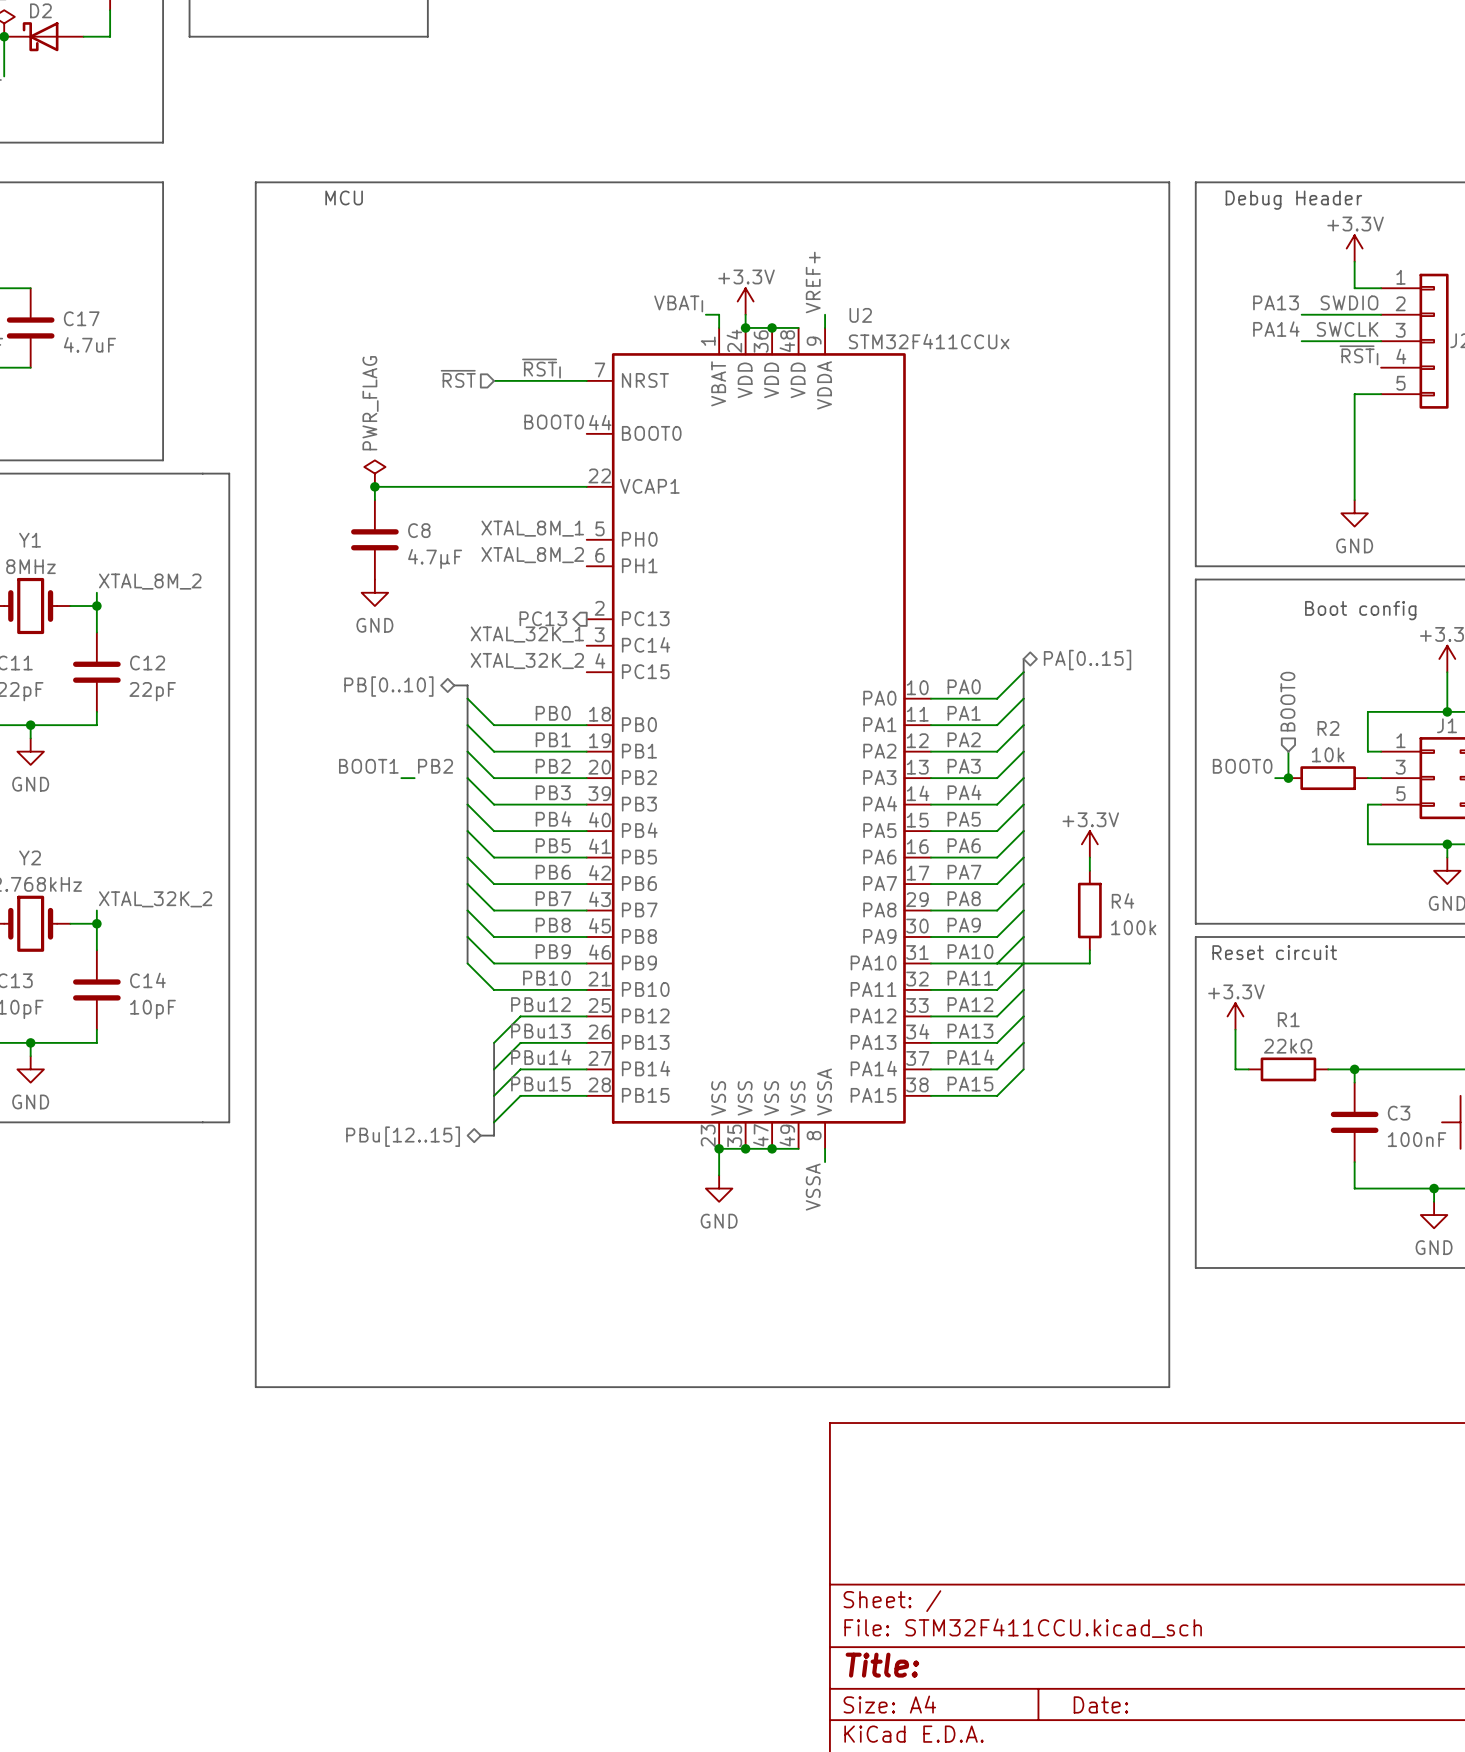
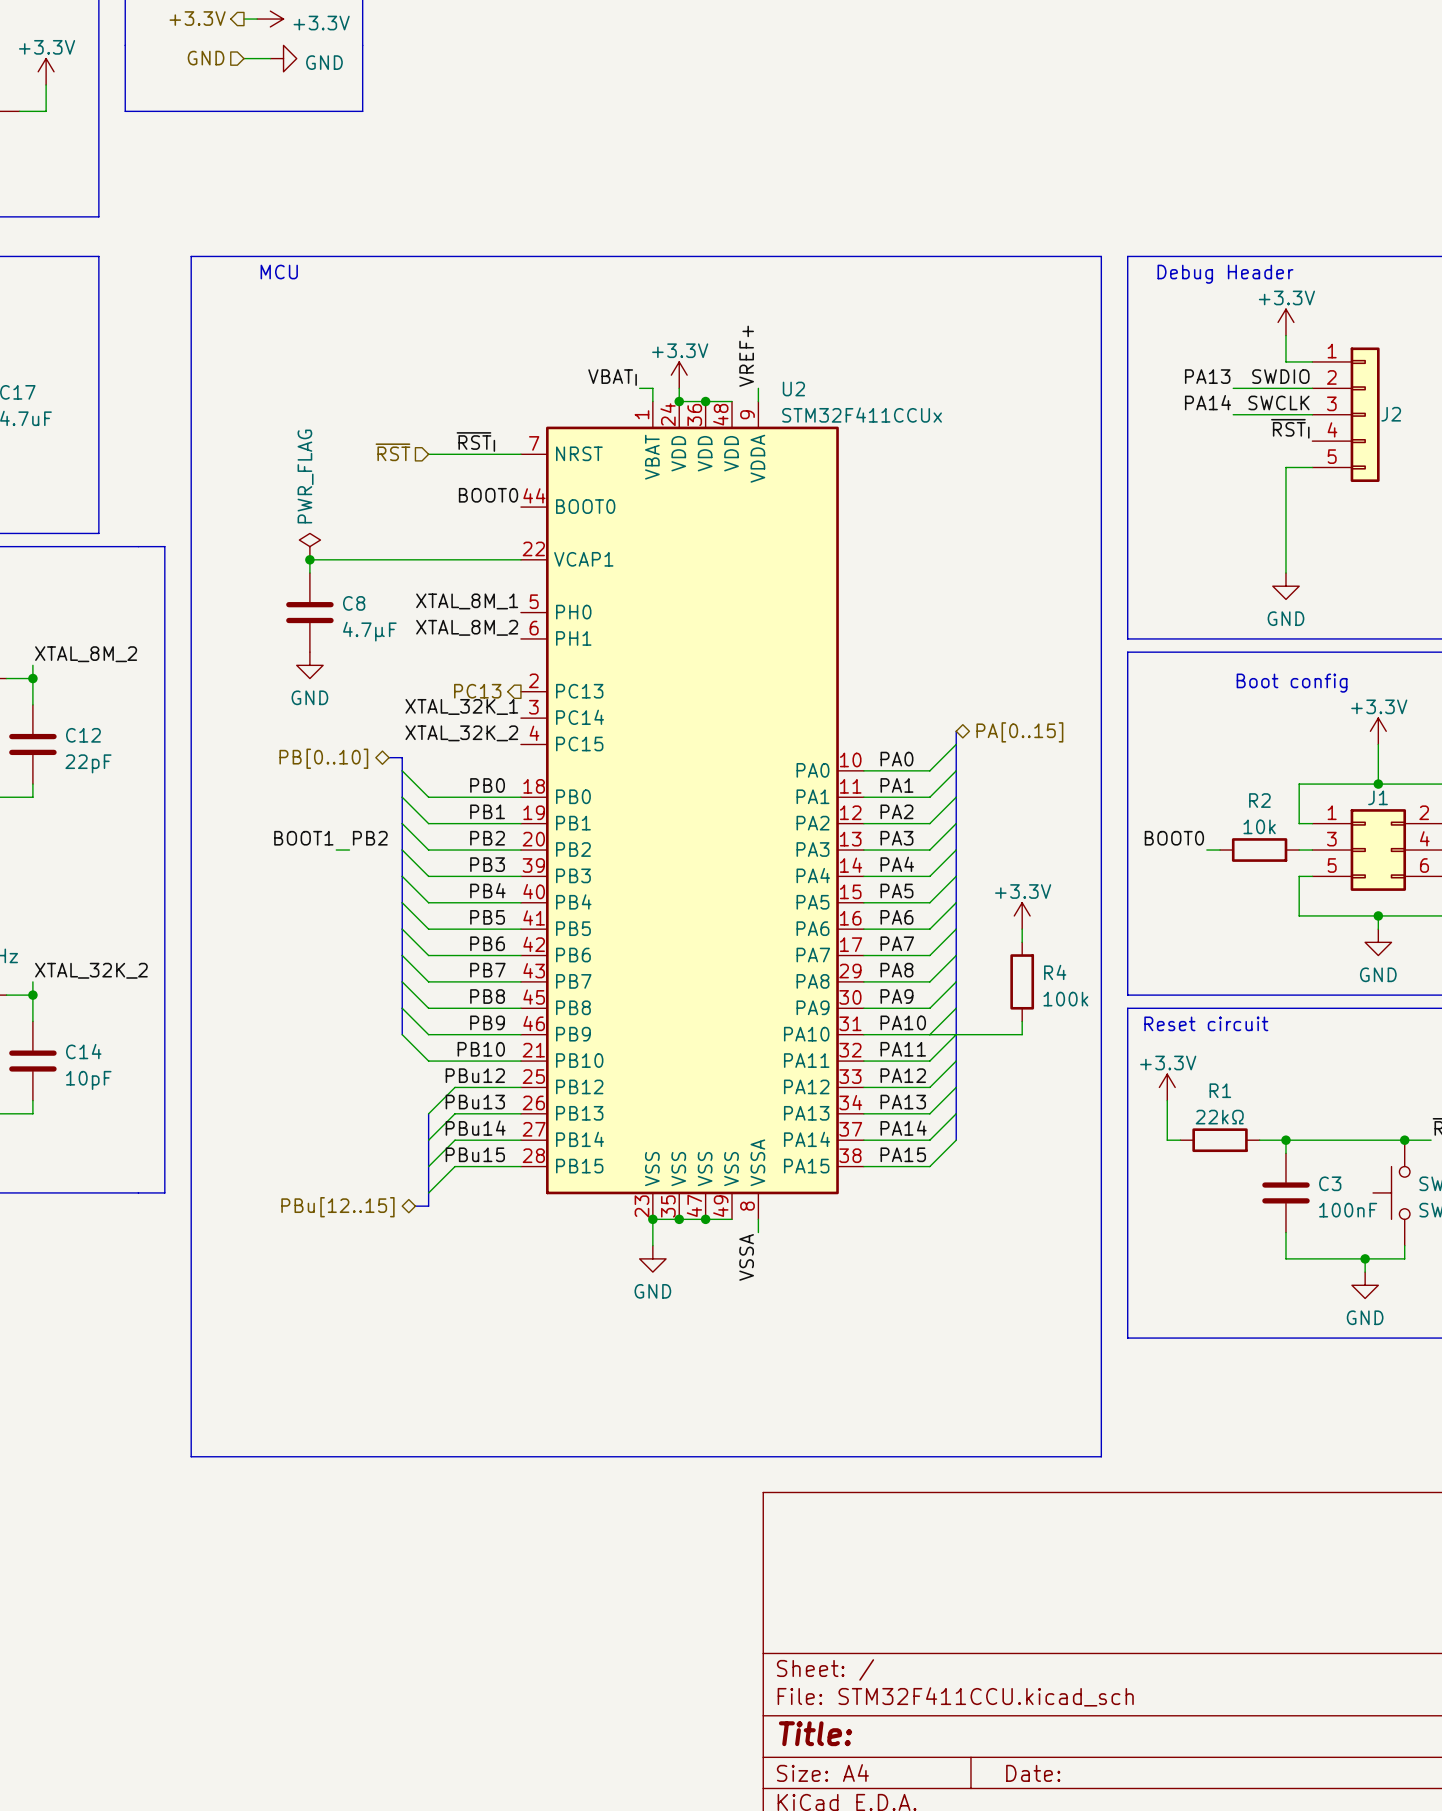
hierarchical label: BOOT0 (1287, 701) -> none
wire: (1288, 751) (1288, 778) -> none
junction: (1288, 778) -> none

